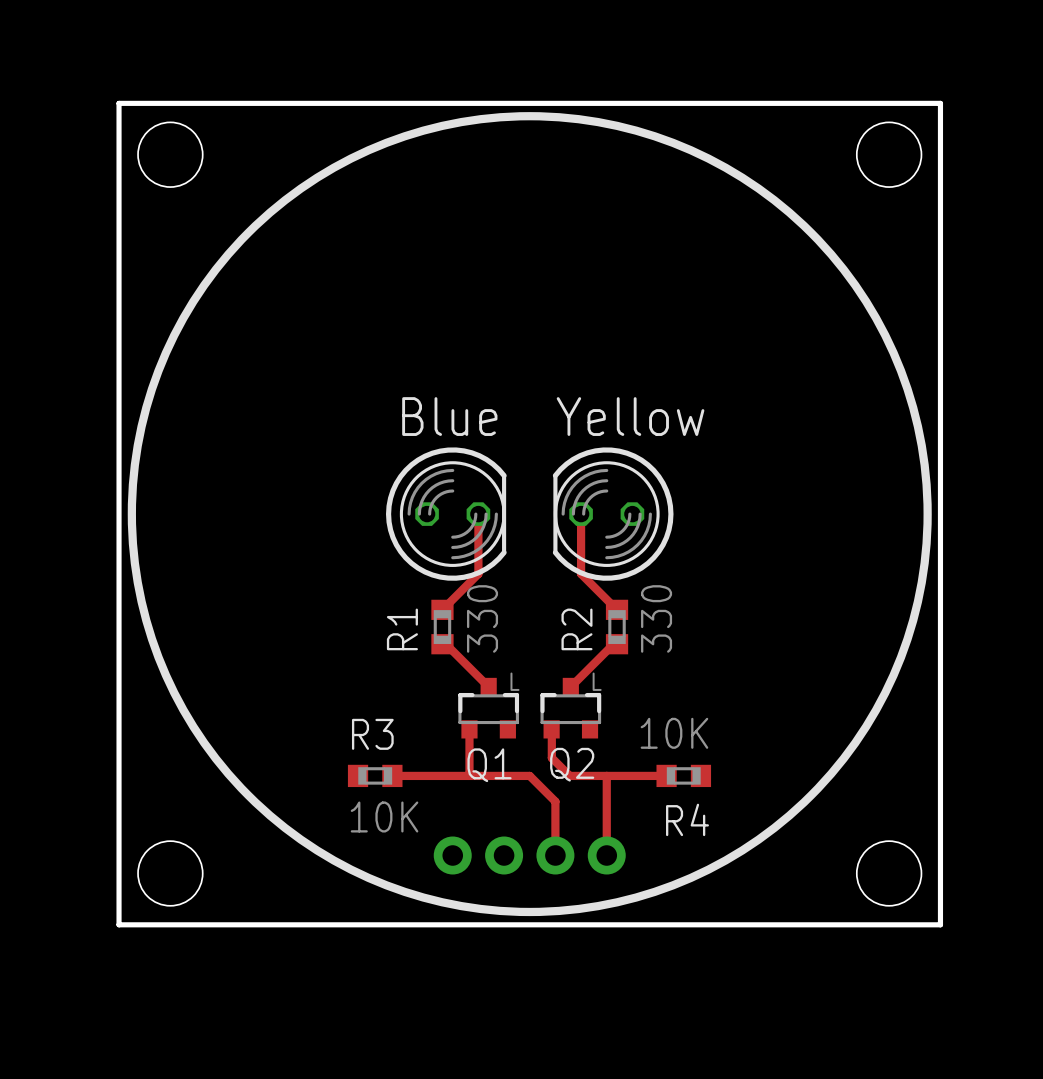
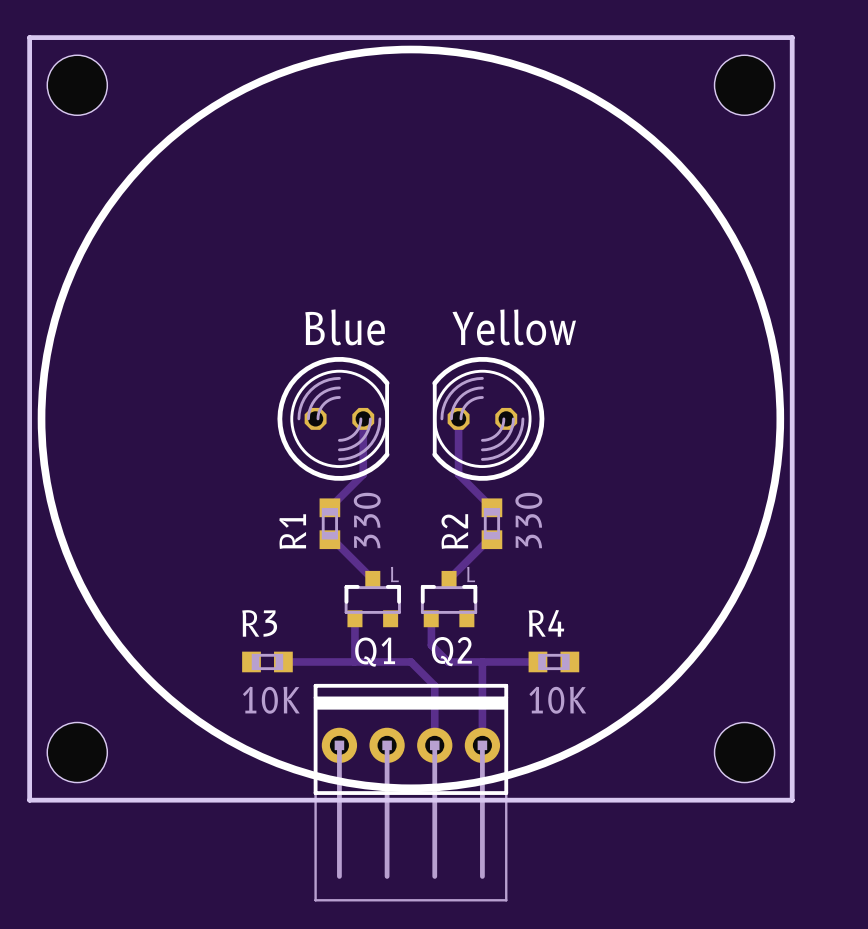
R4 value position: 10K (674, 733) -> 10K (557, 700)
R4 name position: R4 (687, 819) -> R4 (546, 623)
part side: bottom (529, 855) -> top (410, 792)

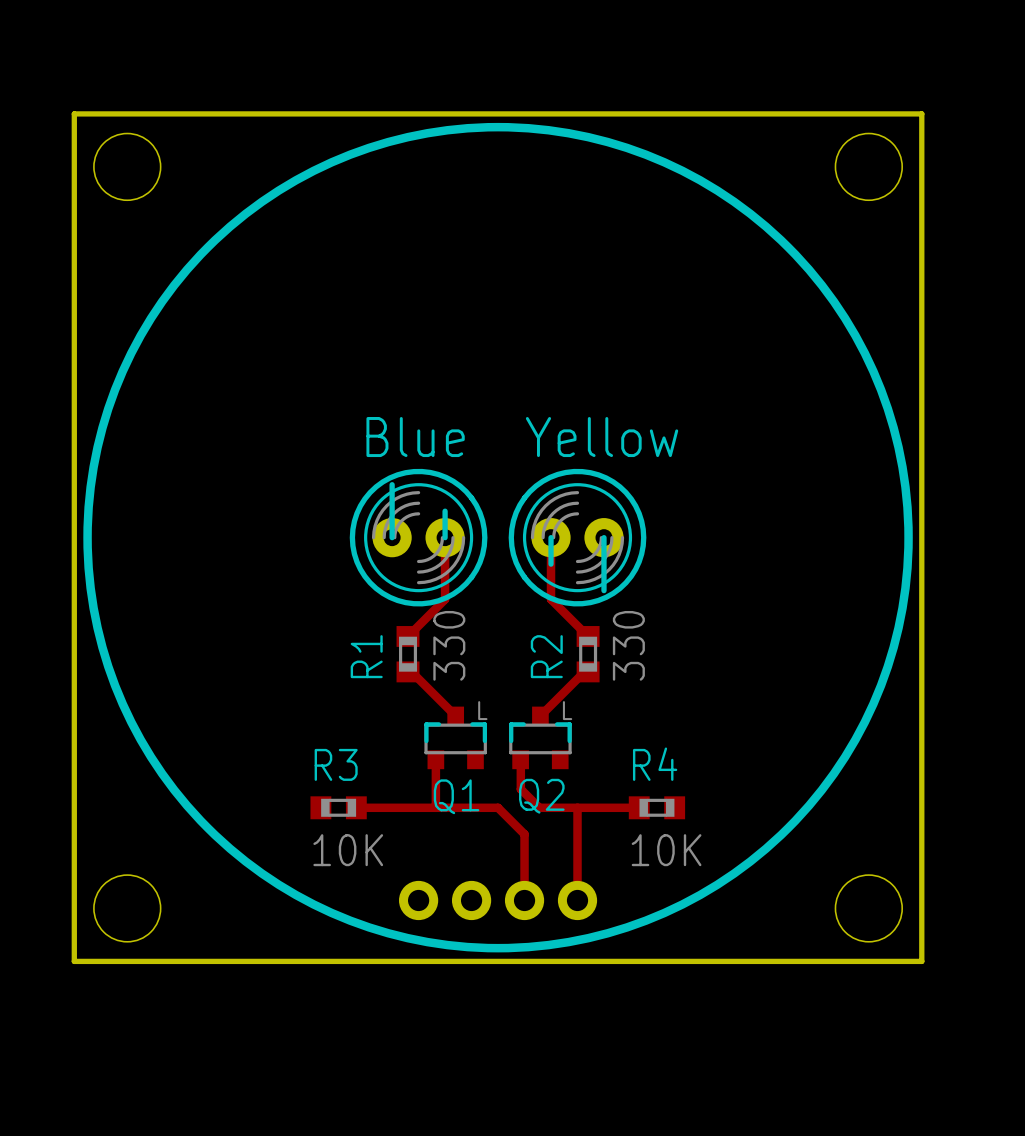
part footprint: [277, 357, 390, 481] -> [349, 468, 488, 607]
part footprint: [432, 357, 545, 481] -> [508, 468, 647, 607]
part side: top (410, 792) -> bottom (498, 900)

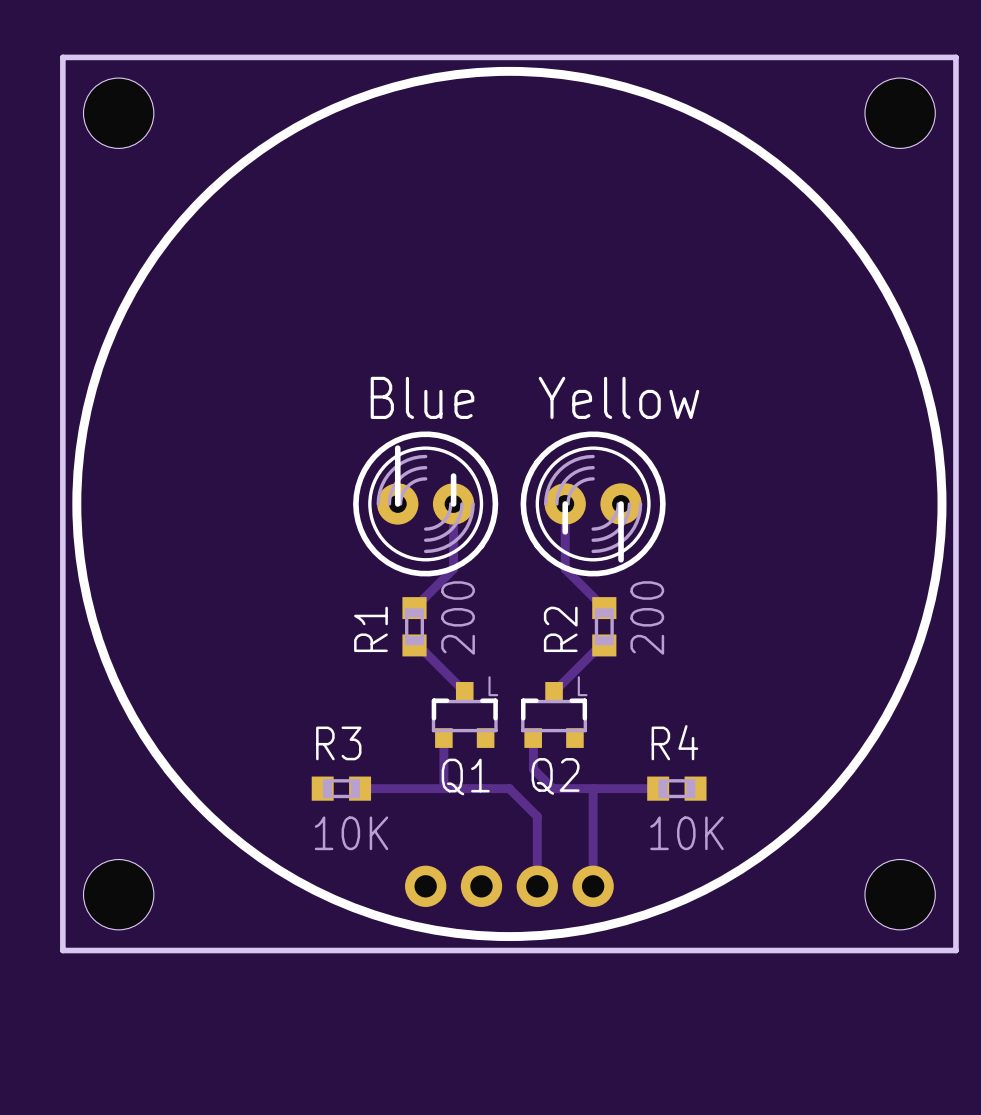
R1 value: 330 (449, 645) -> 200 (458, 617)
R2 value: 330 (628, 645) -> 200 (647, 617)

